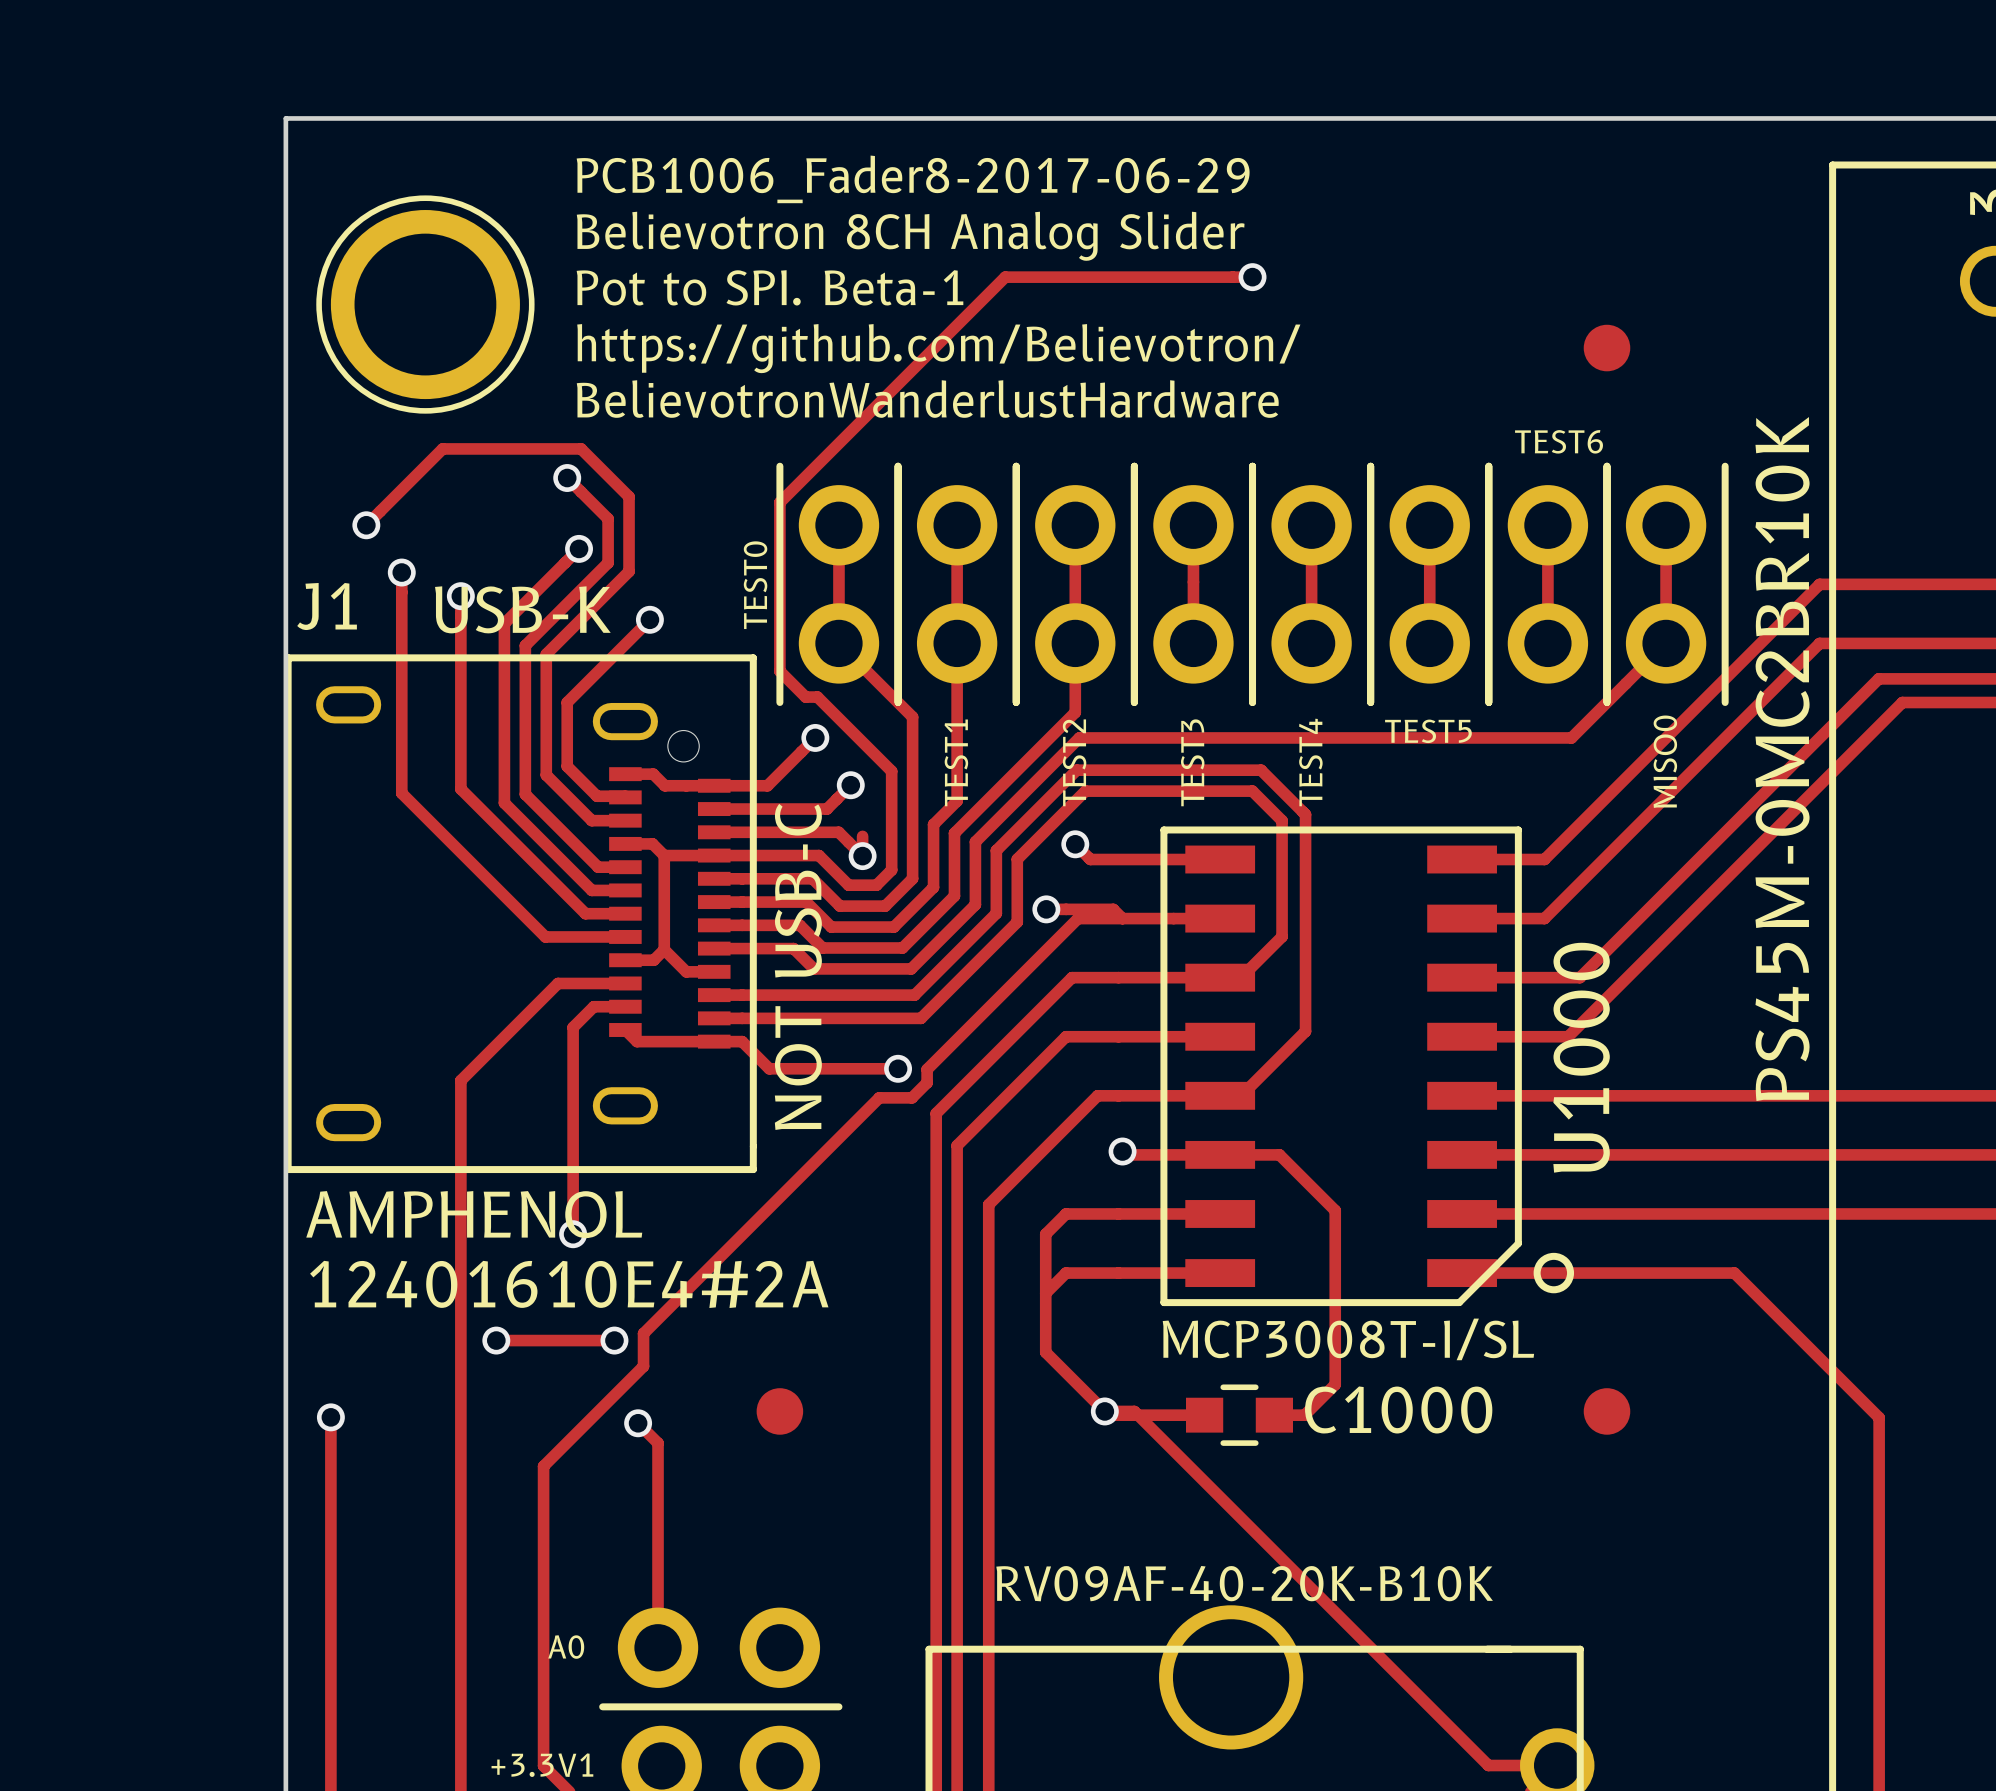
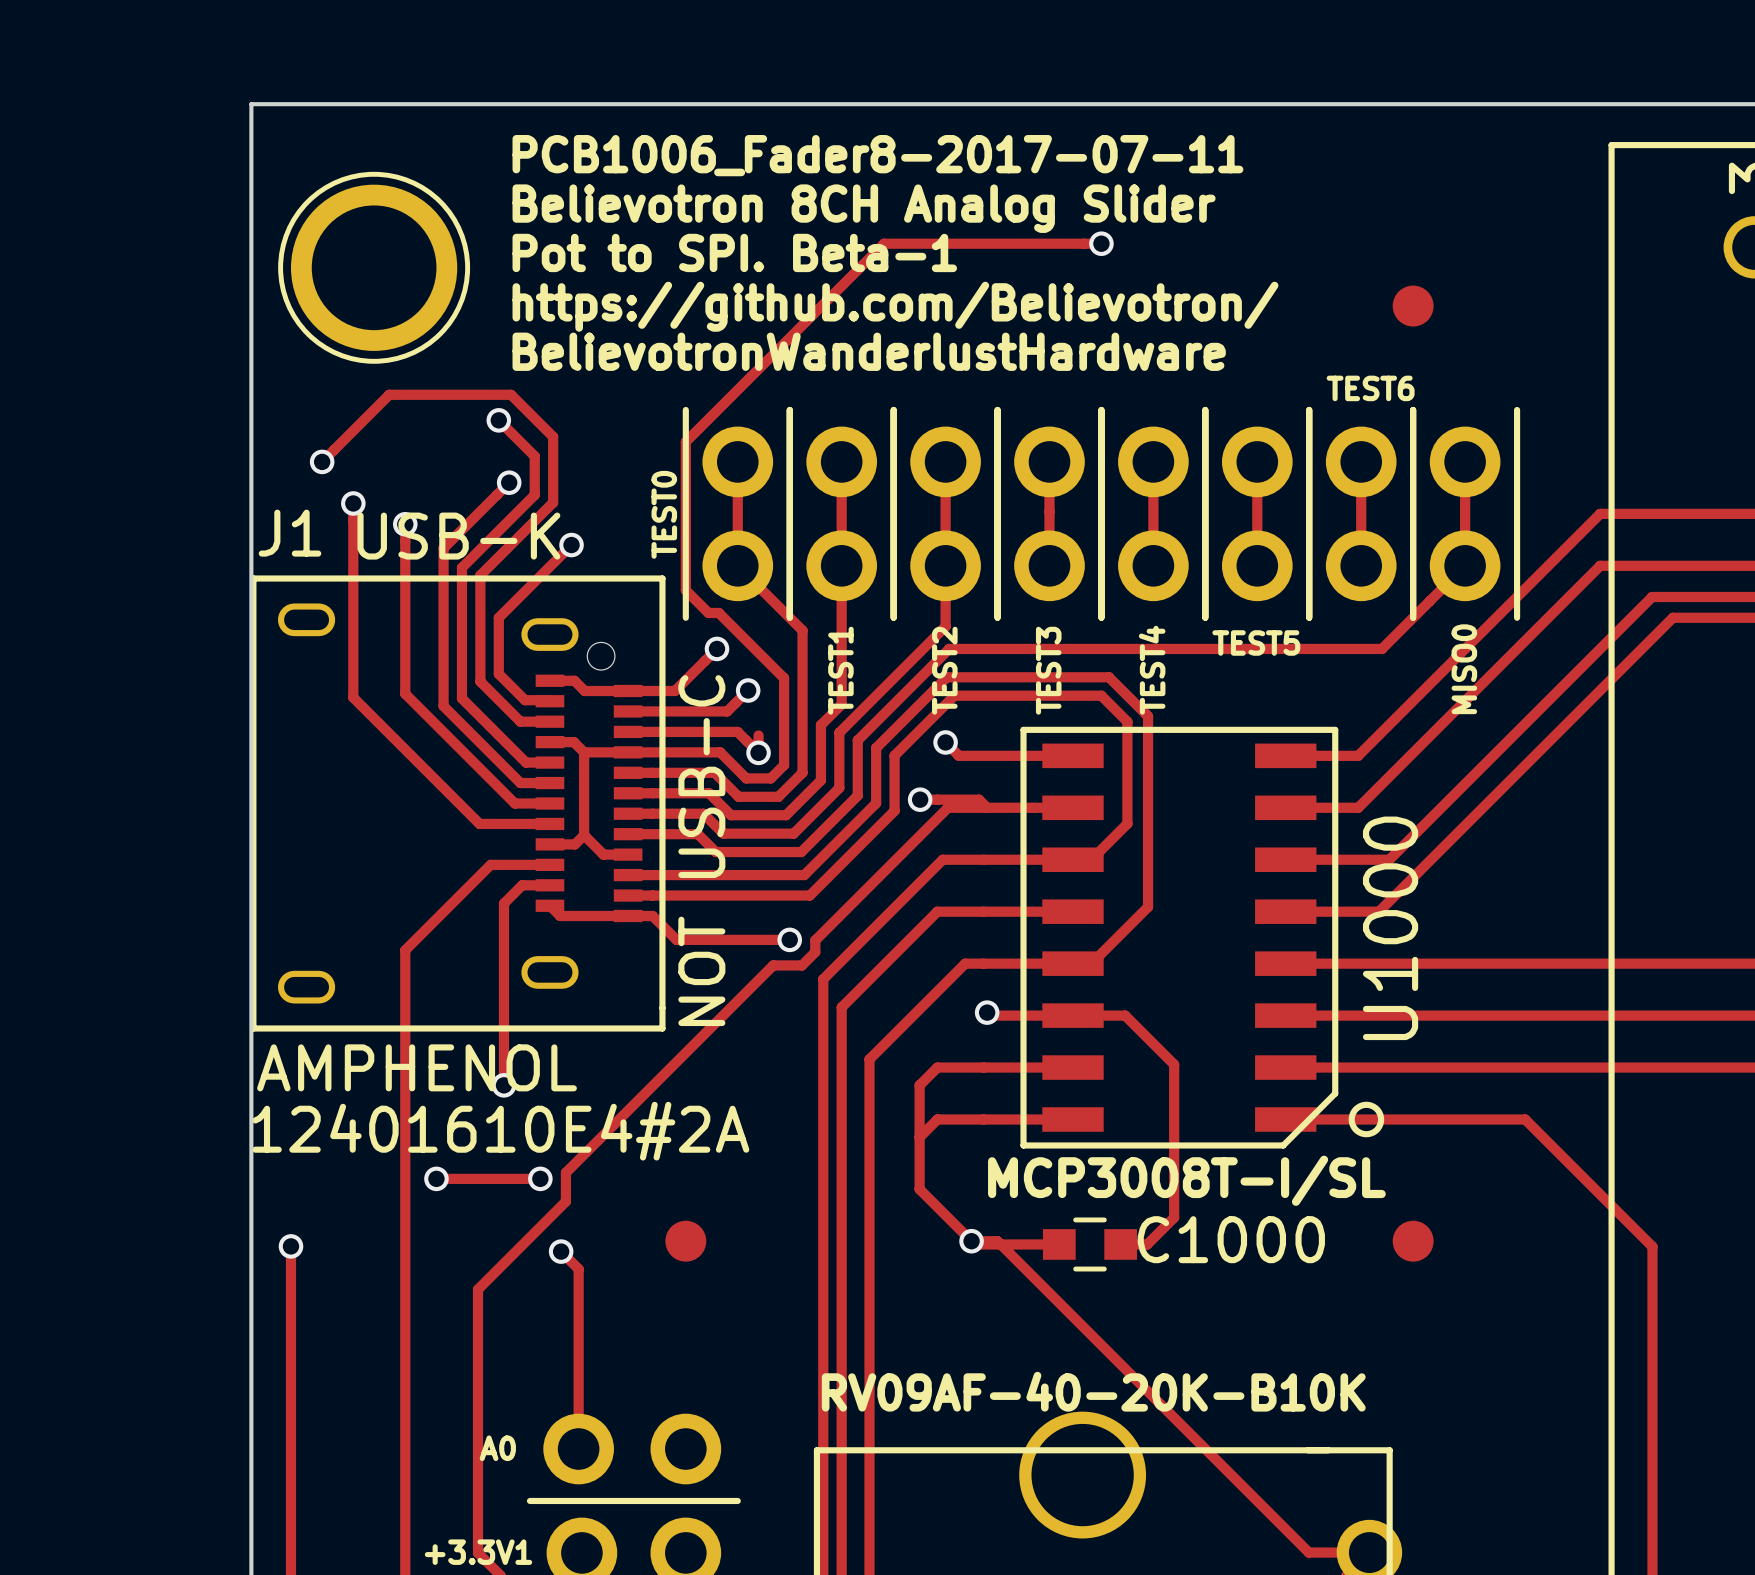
text: PCB1006_Fader8-2017-06-29 (913, 179) -> PCB1006_Fader8-2017-07-11 (877, 155)
text: PS45M-0MC2BR10K (1782, 759) -> none

